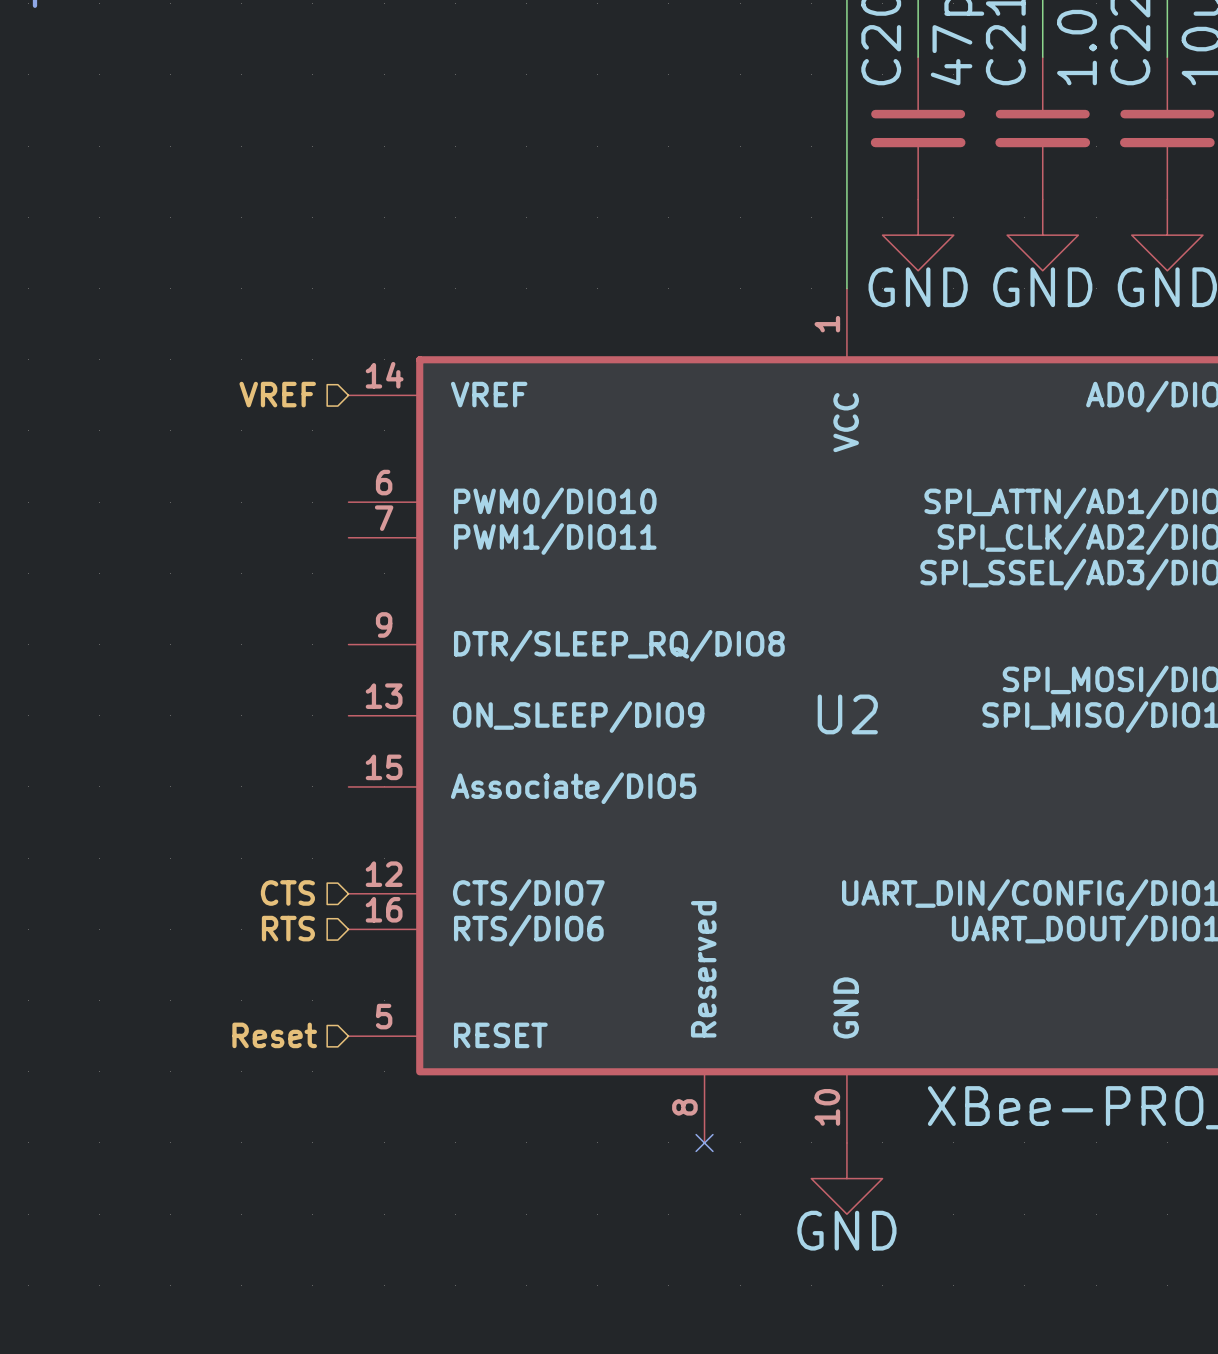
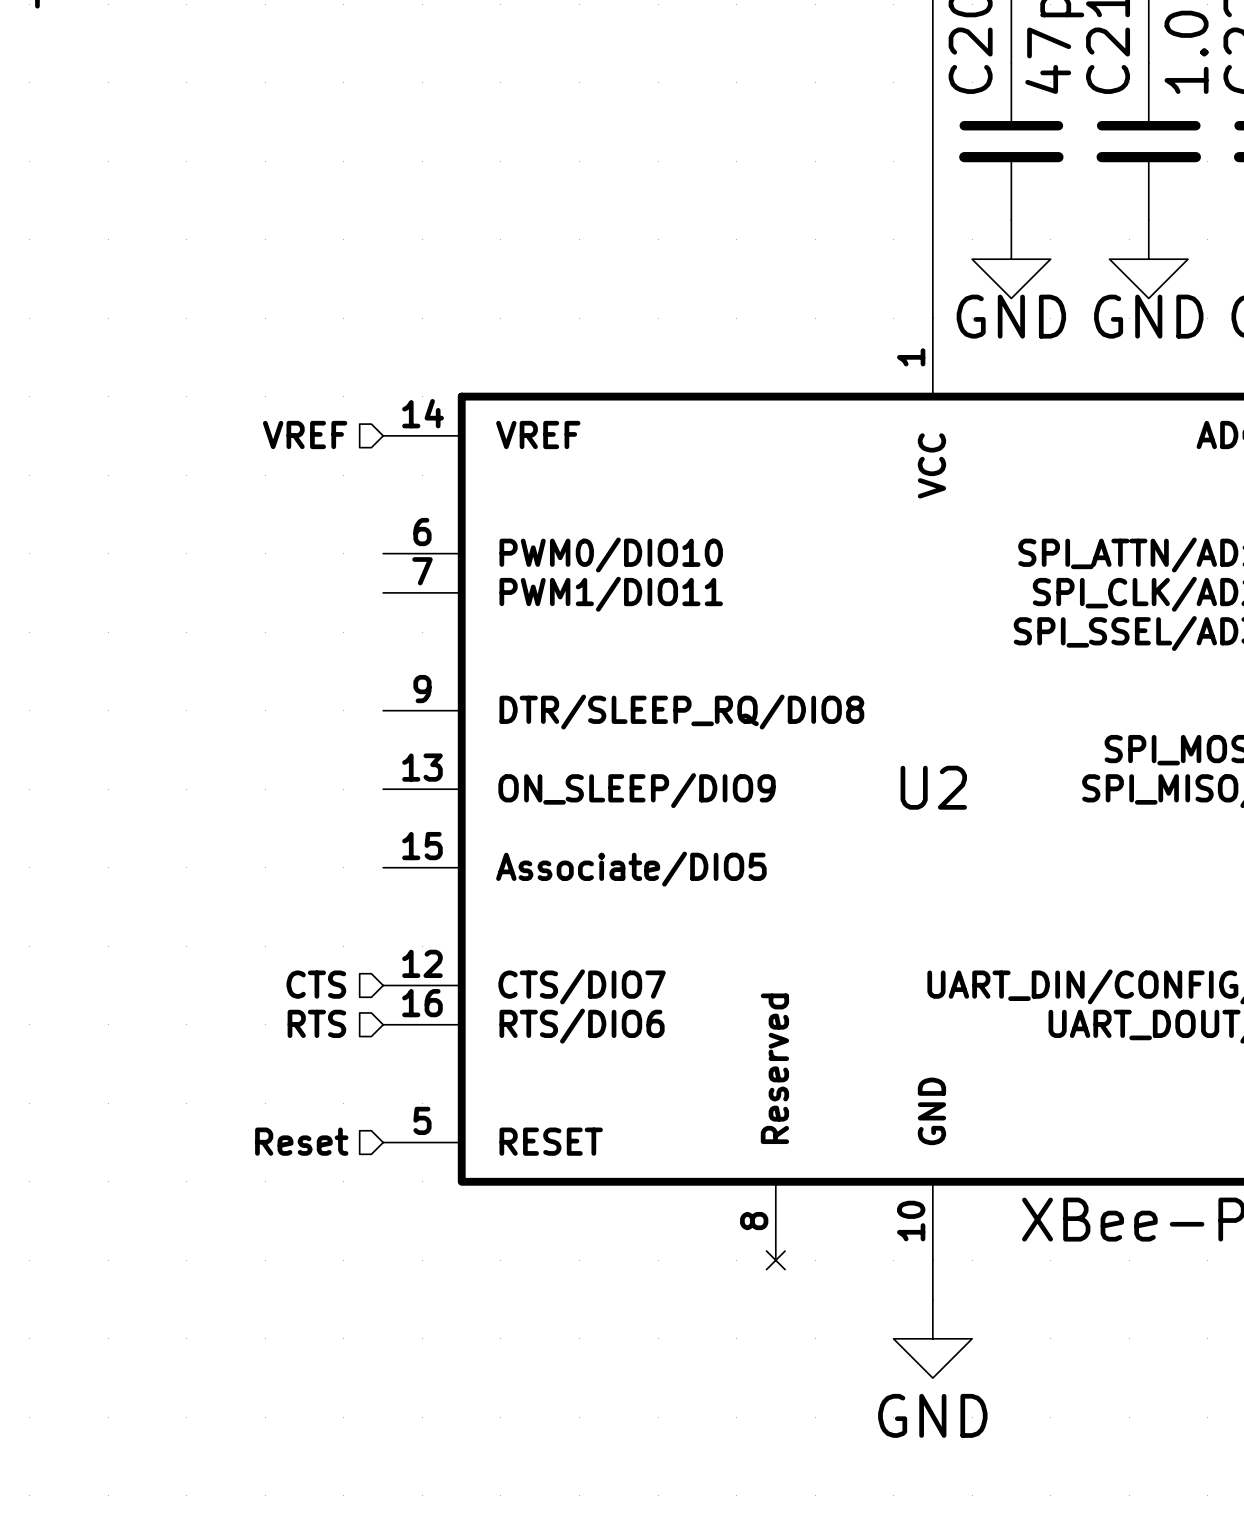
power symbol position: GND (846, 1178) -> GND (932, 1338)
power symbol text position: GND (846, 1230) -> GND (932, 1415)

